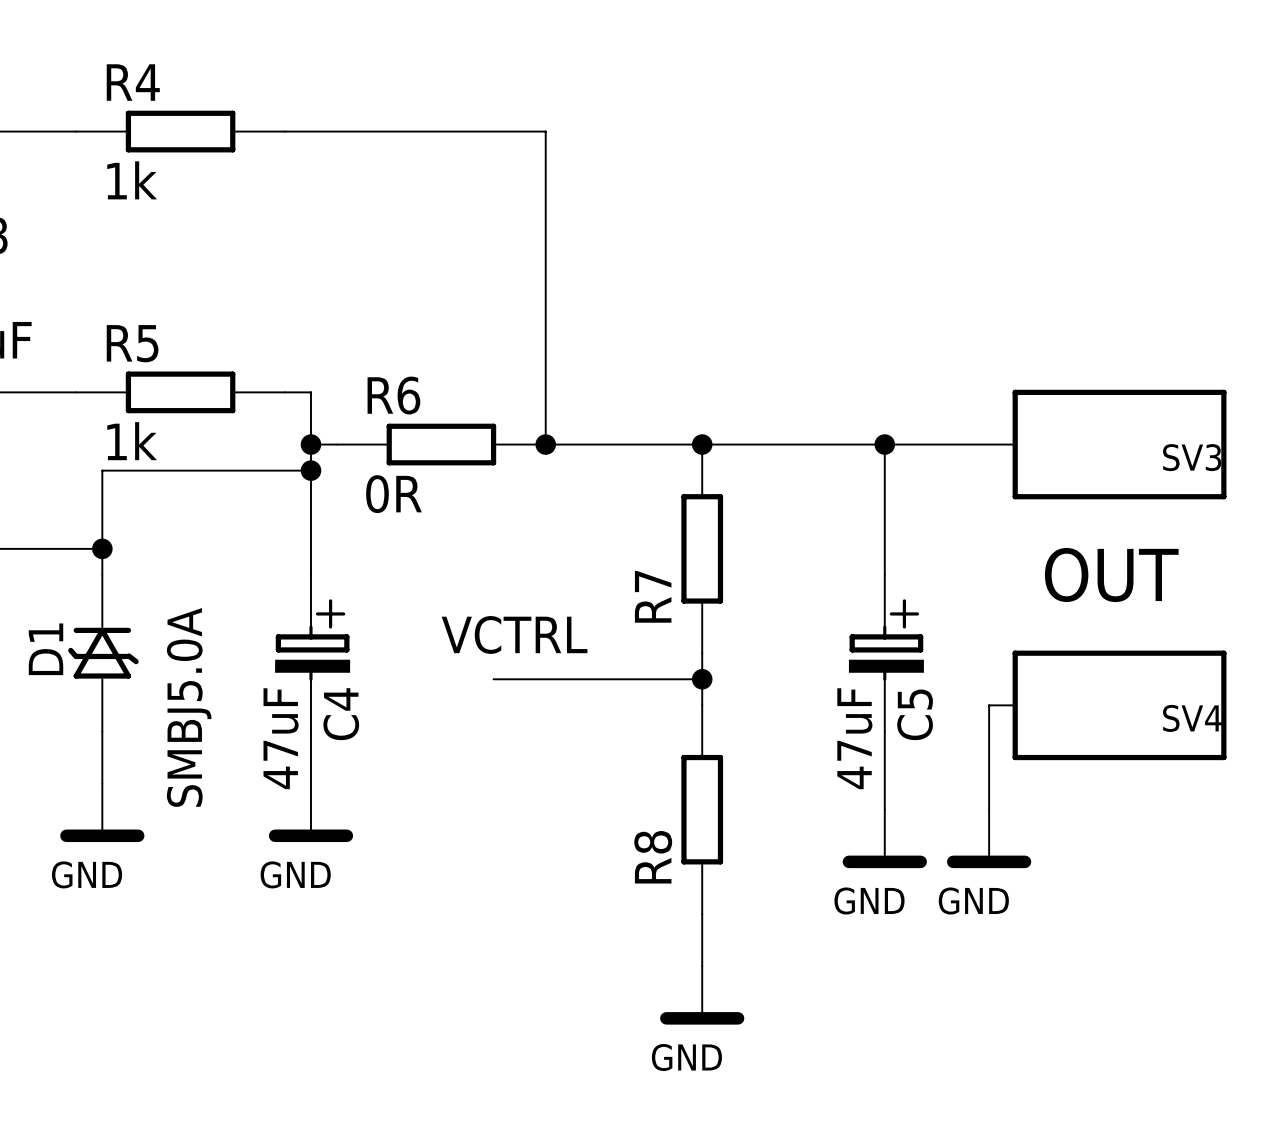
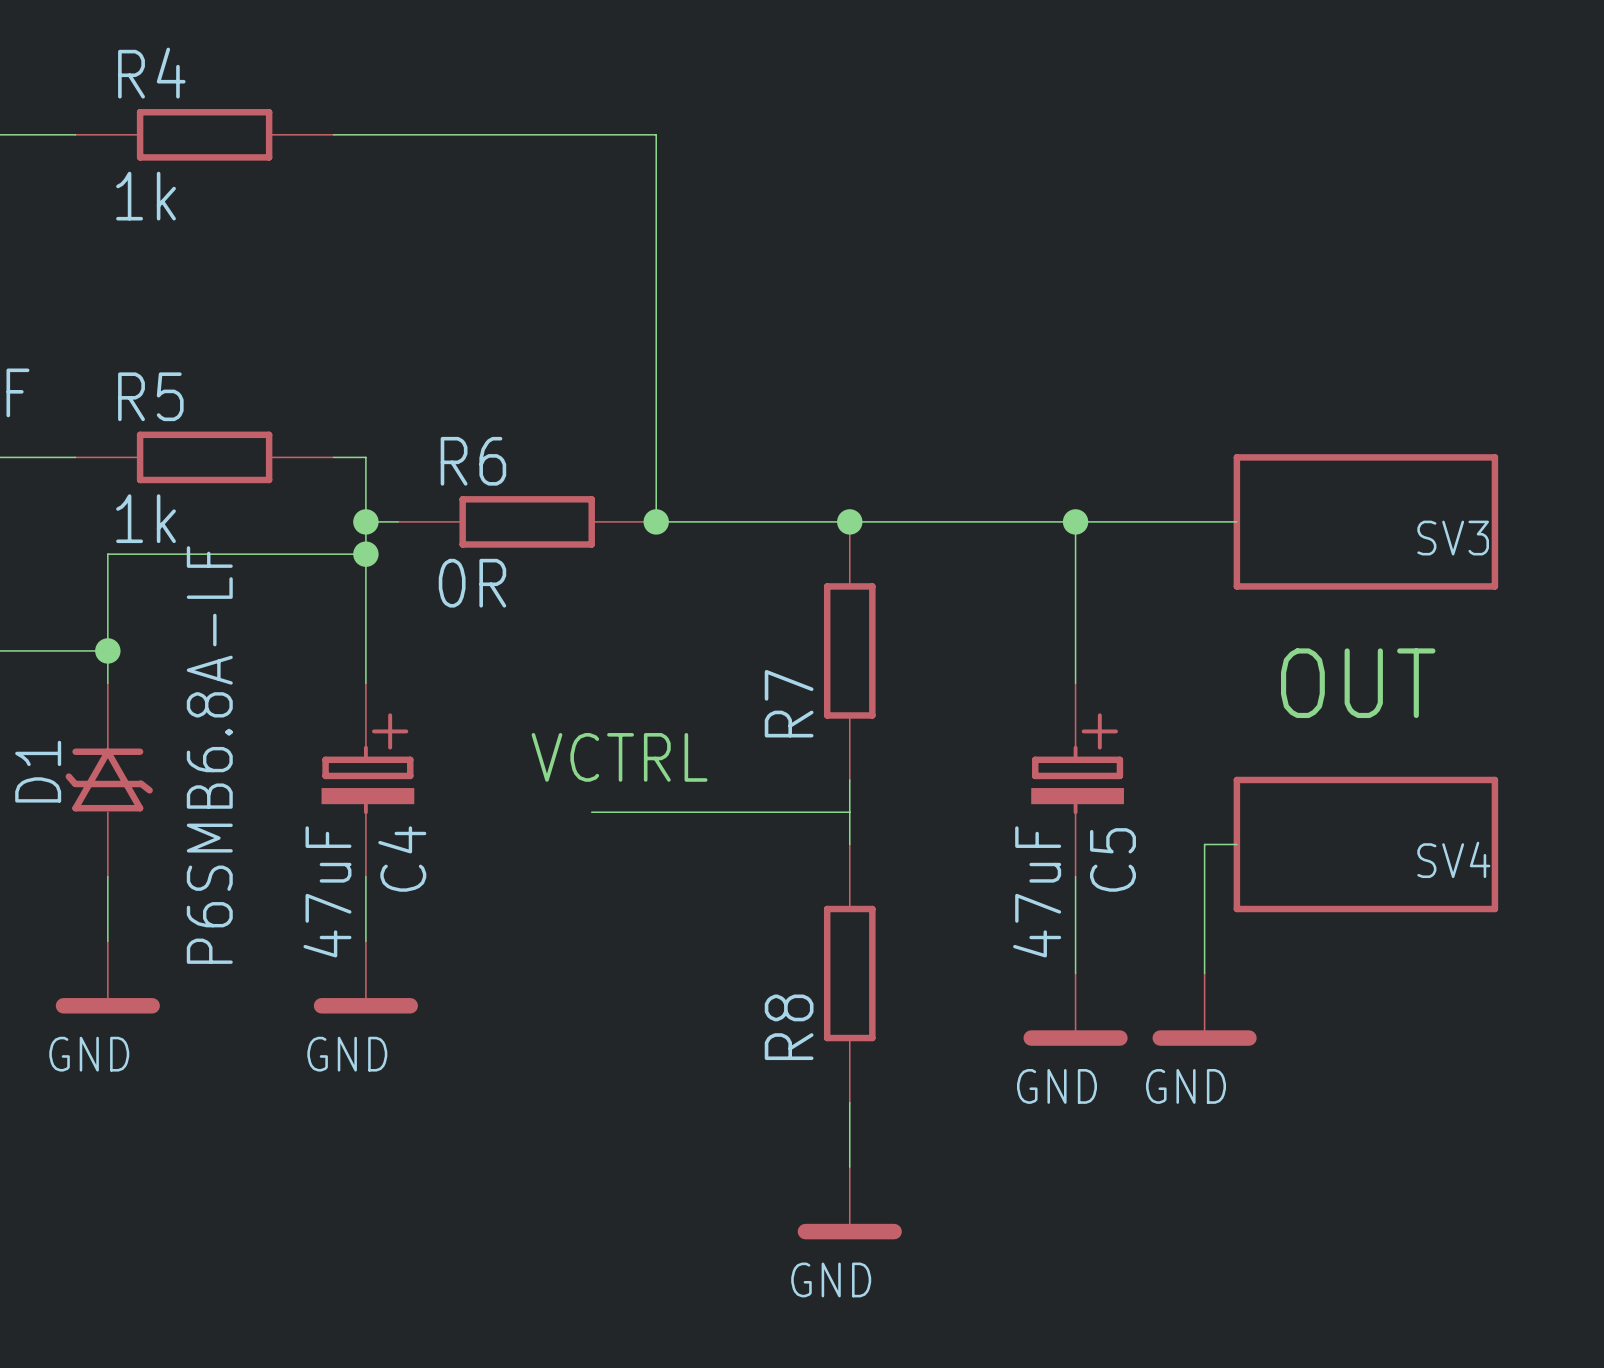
junction: (702, 679) -> none
D1 value: SMBJ5.0A (189, 707) -> P6SMB6.8A-LF (209, 755)

